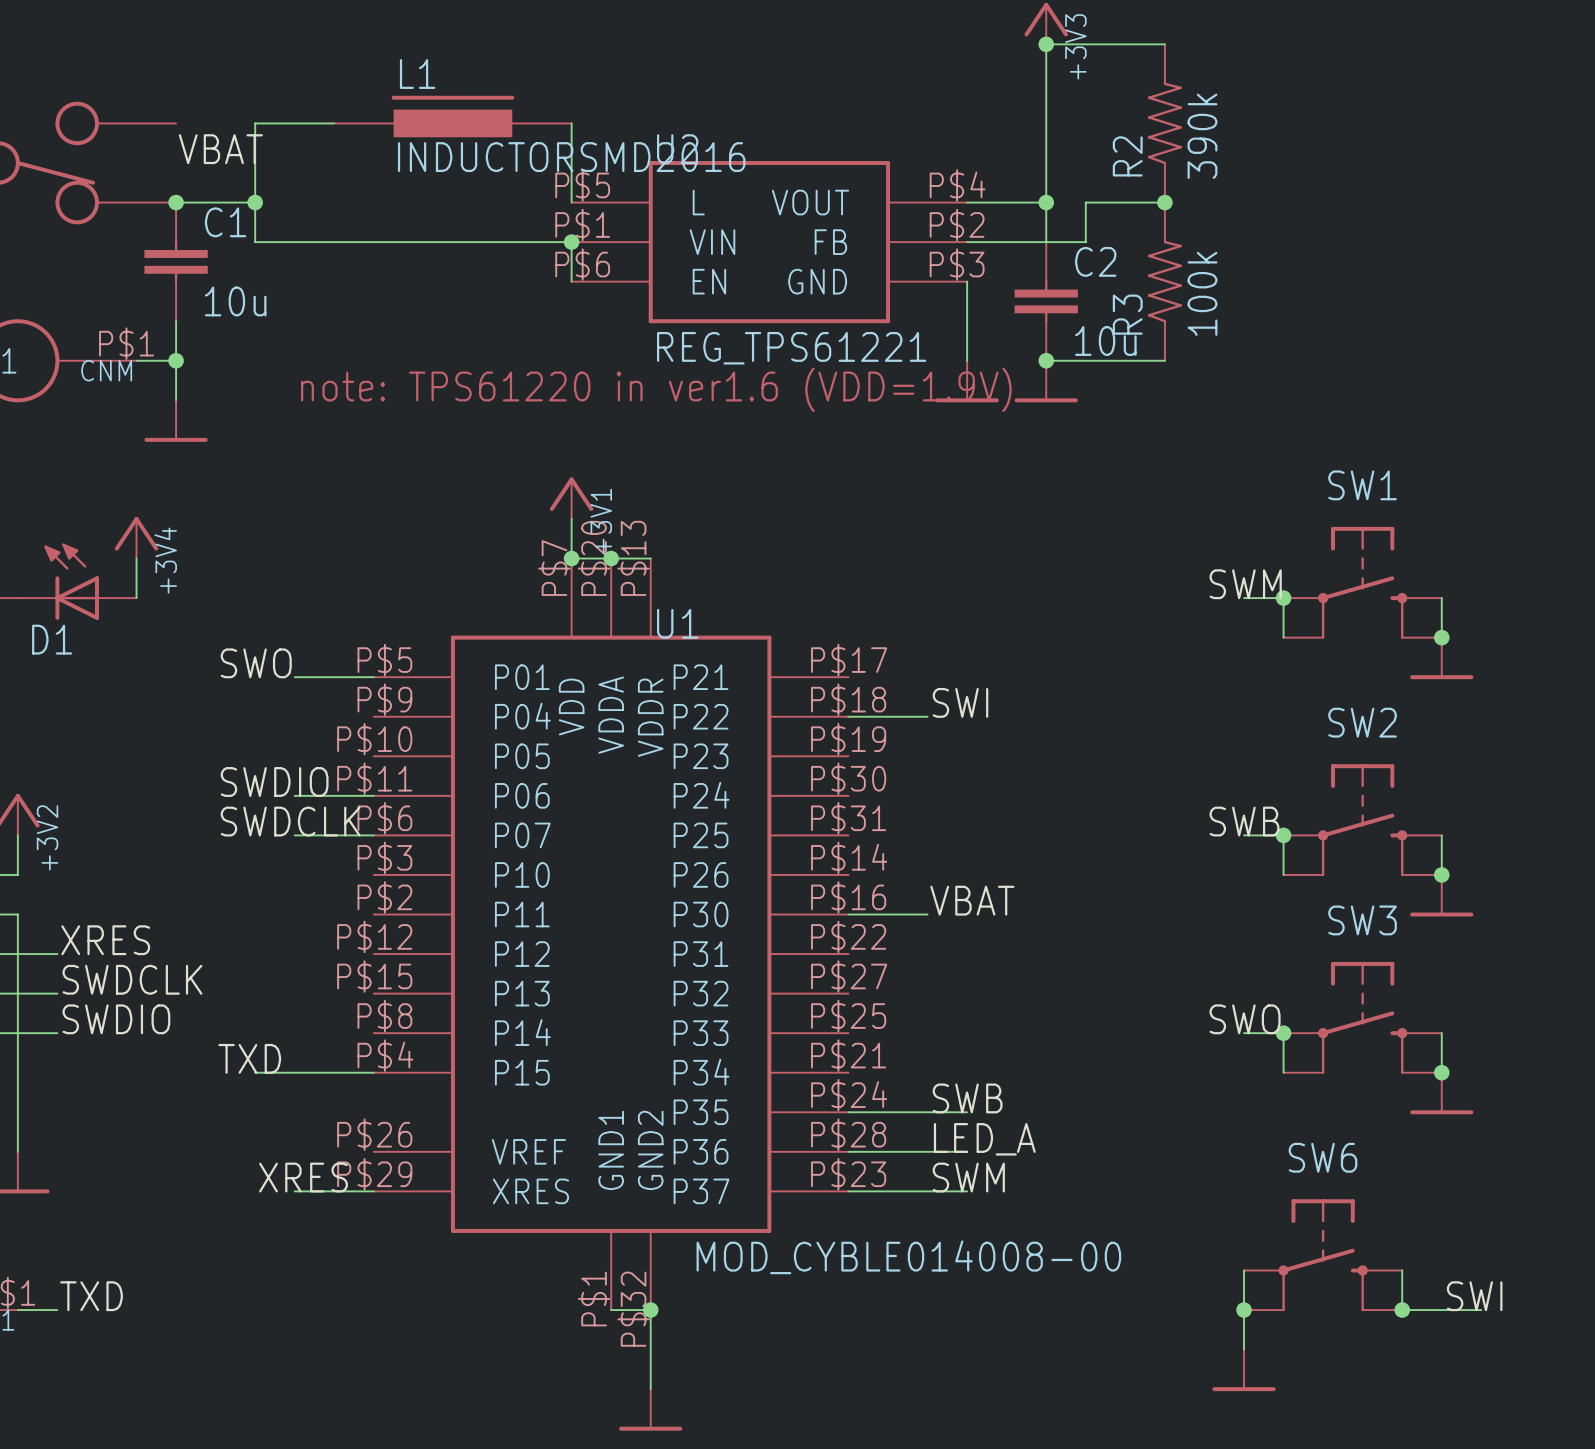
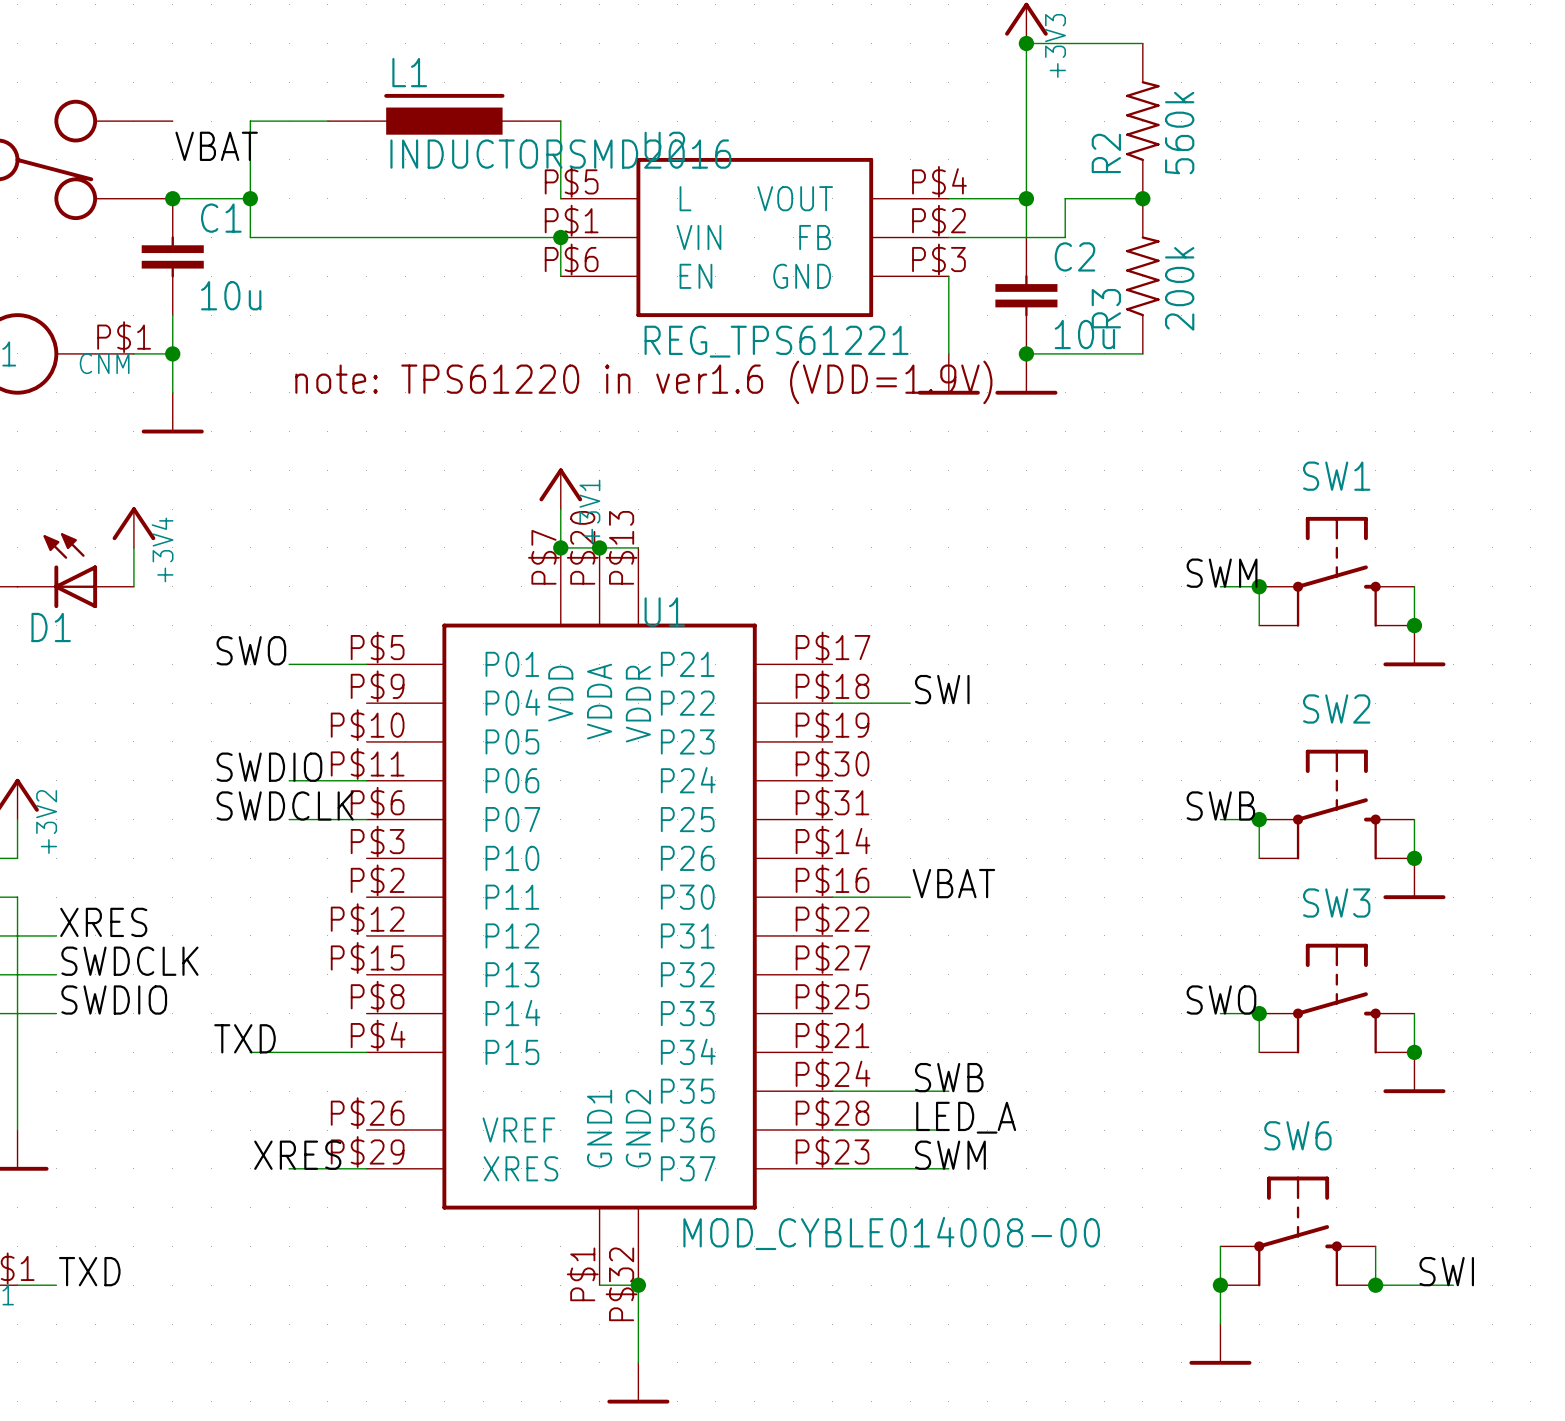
R2 value: 390k (1202, 136) -> 560k (1179, 133)
R3 value: 100k (1202, 293) -> 200k (1179, 288)

